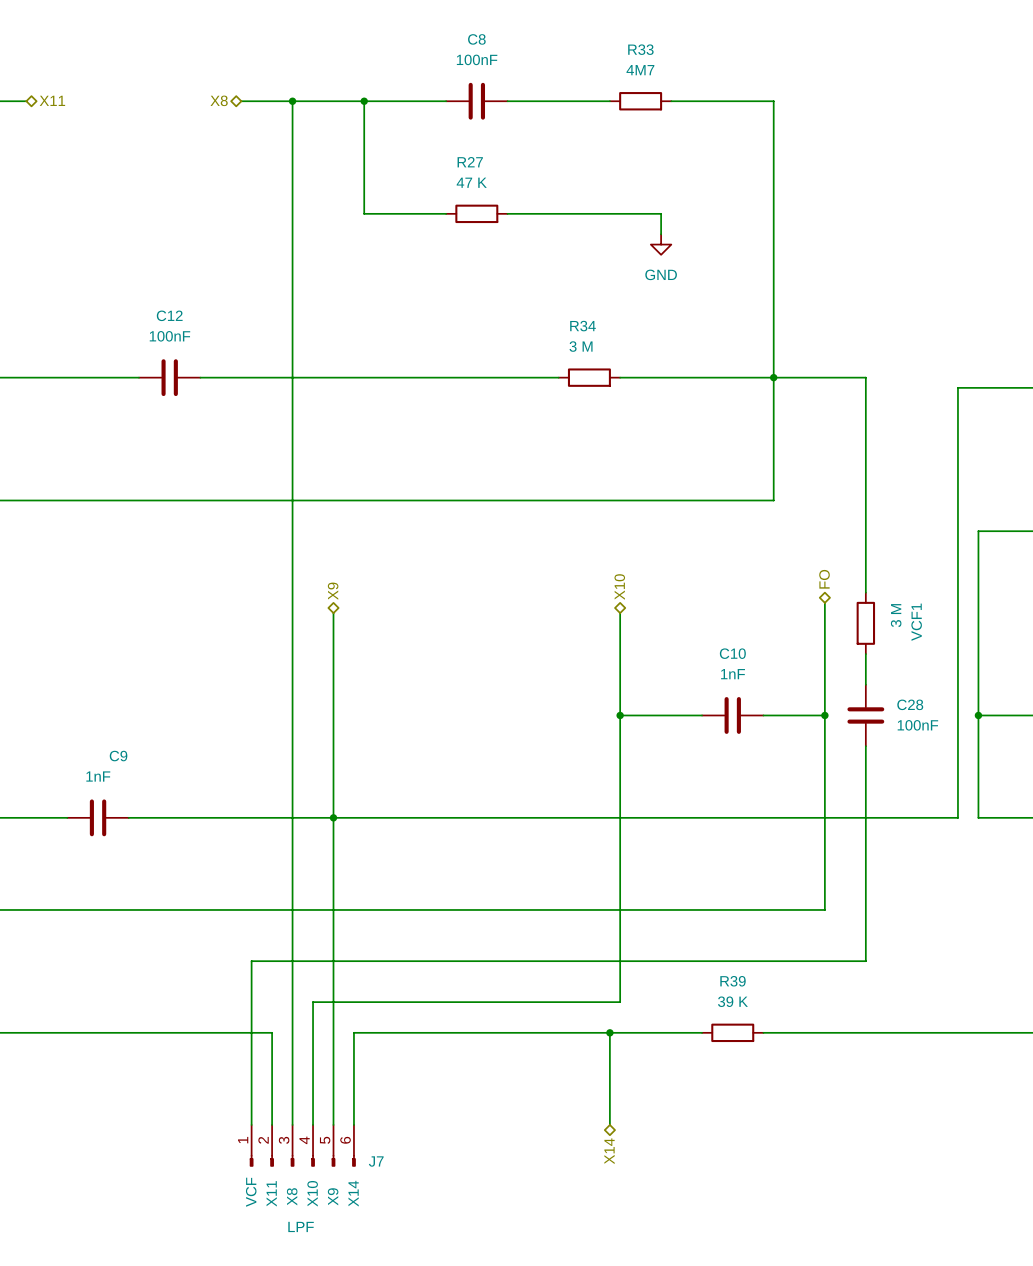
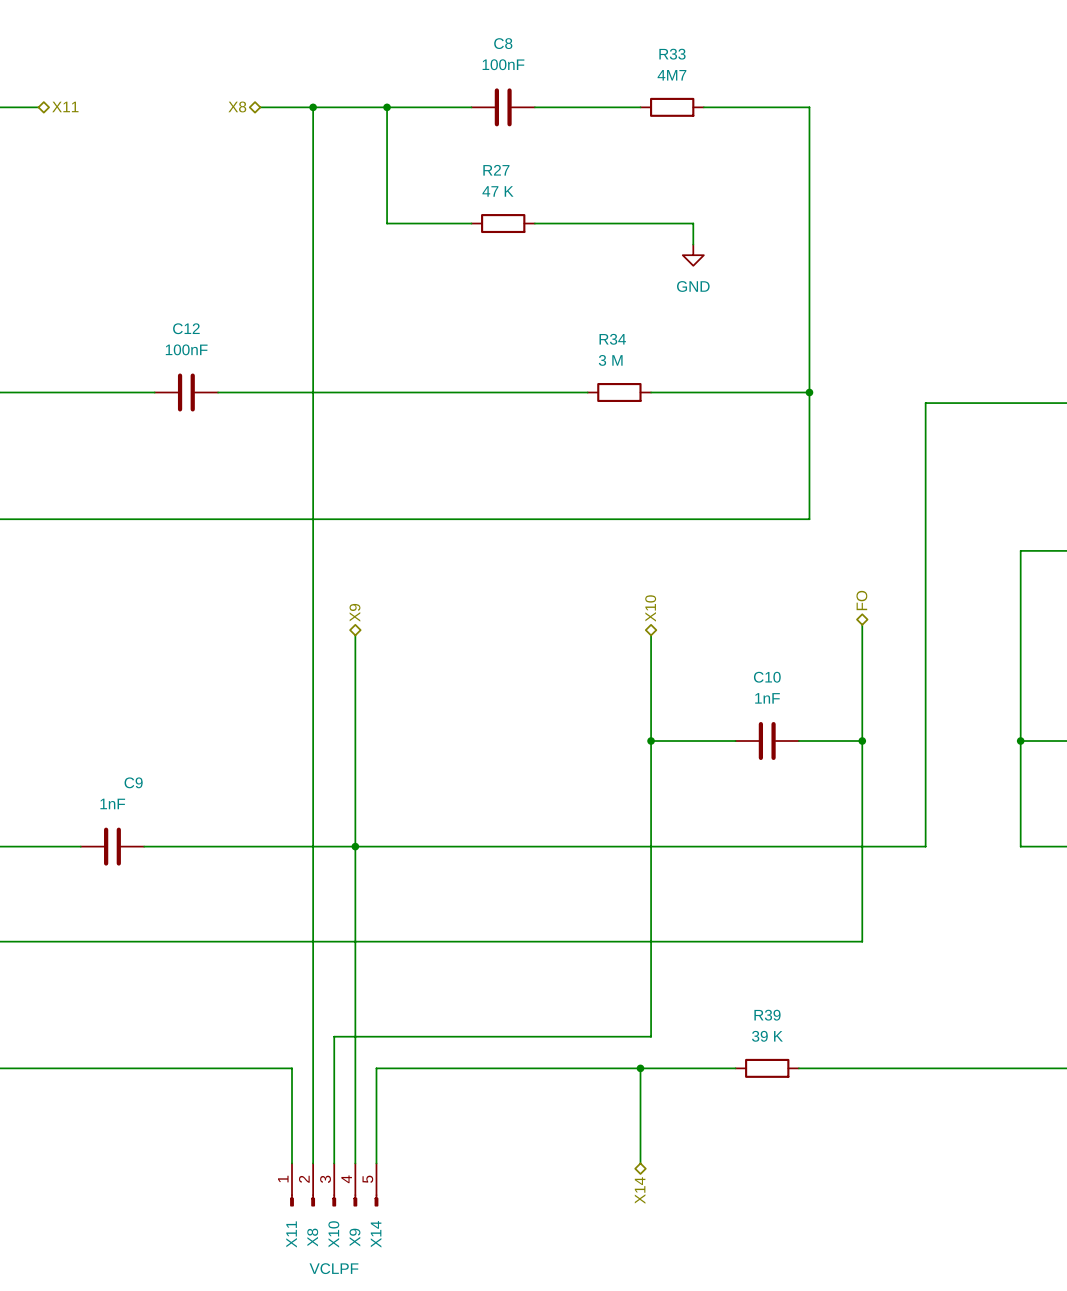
wire: (773, 377) (865, 377) (865, 592) -> none
wire: (957, 387) (957, 817) (886, 817) -> (999, 403) (925, 403) (925, 846)
VCF1: 3 M (865, 623) -> none
wire: (865, 654) (865, 684) -> none
C28: 100nF (865, 715) -> none
wire: (865, 746) (865, 961) (251, 961) (251, 1124) -> none
J7: LPF (302, 1145) -> none
part: none -> VCLPF (334, 1184)

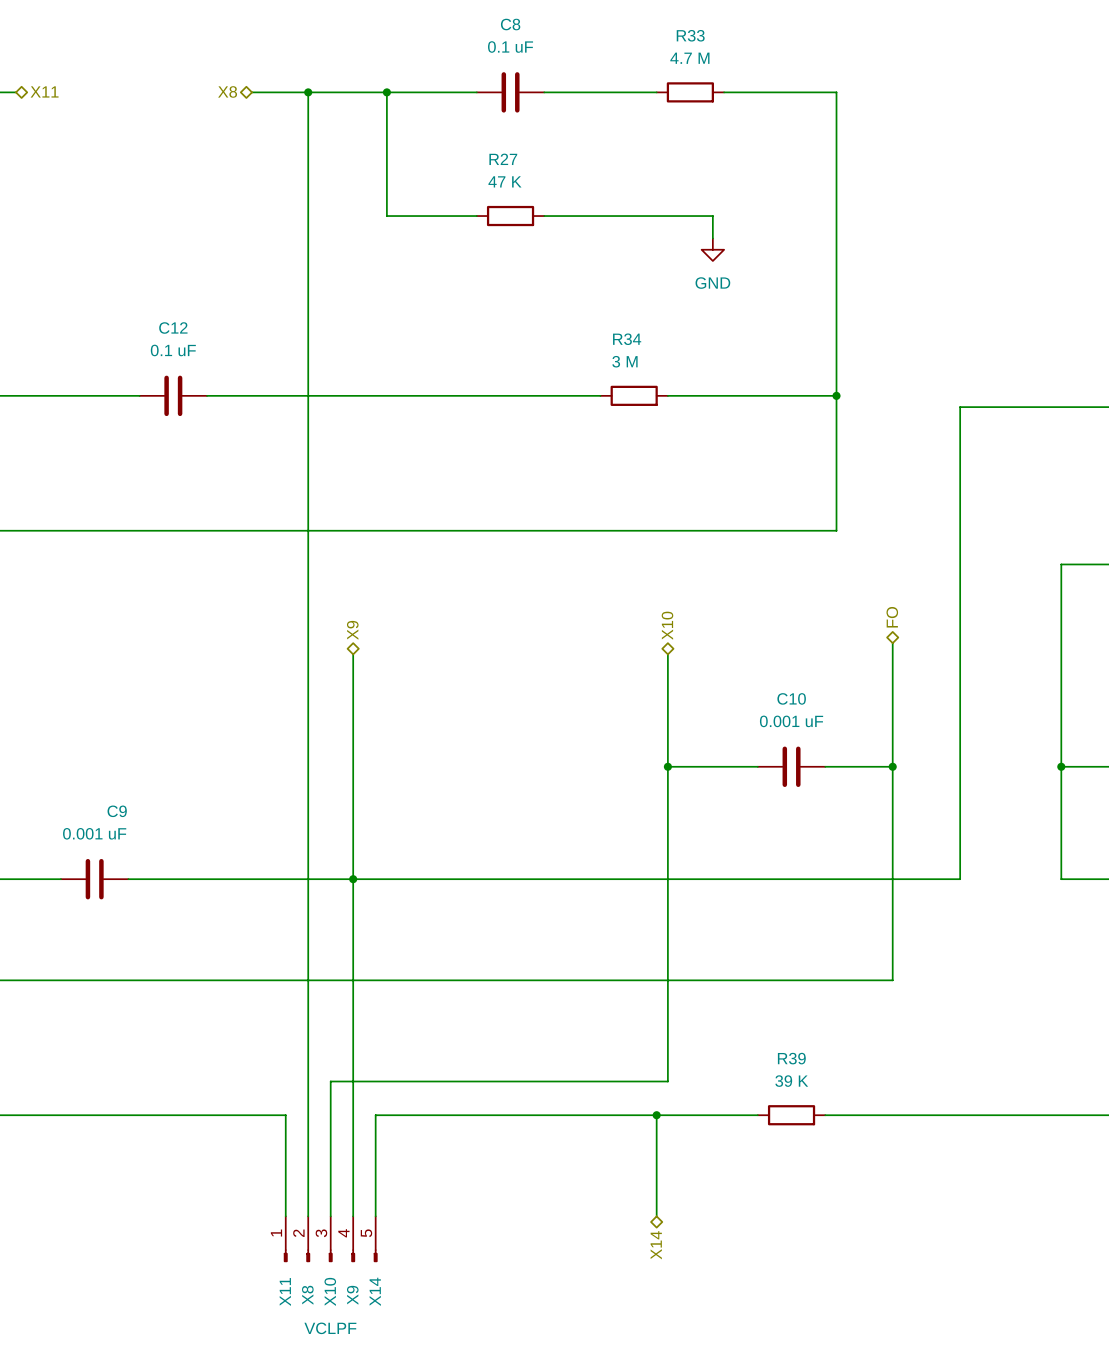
C8 value: 100nF (503, 64) -> 0.1 uF (510, 47)
R33 value: 4M7 (671, 75) -> 4.7 M (689, 58)
C12 value: 100nF (186, 349) -> 0.1 uF (173, 350)
C10 value: 1nF (767, 698) -> 0.001 uF (791, 721)
C9 value: 1nF (112, 803) -> 0.001 uF (94, 833)

